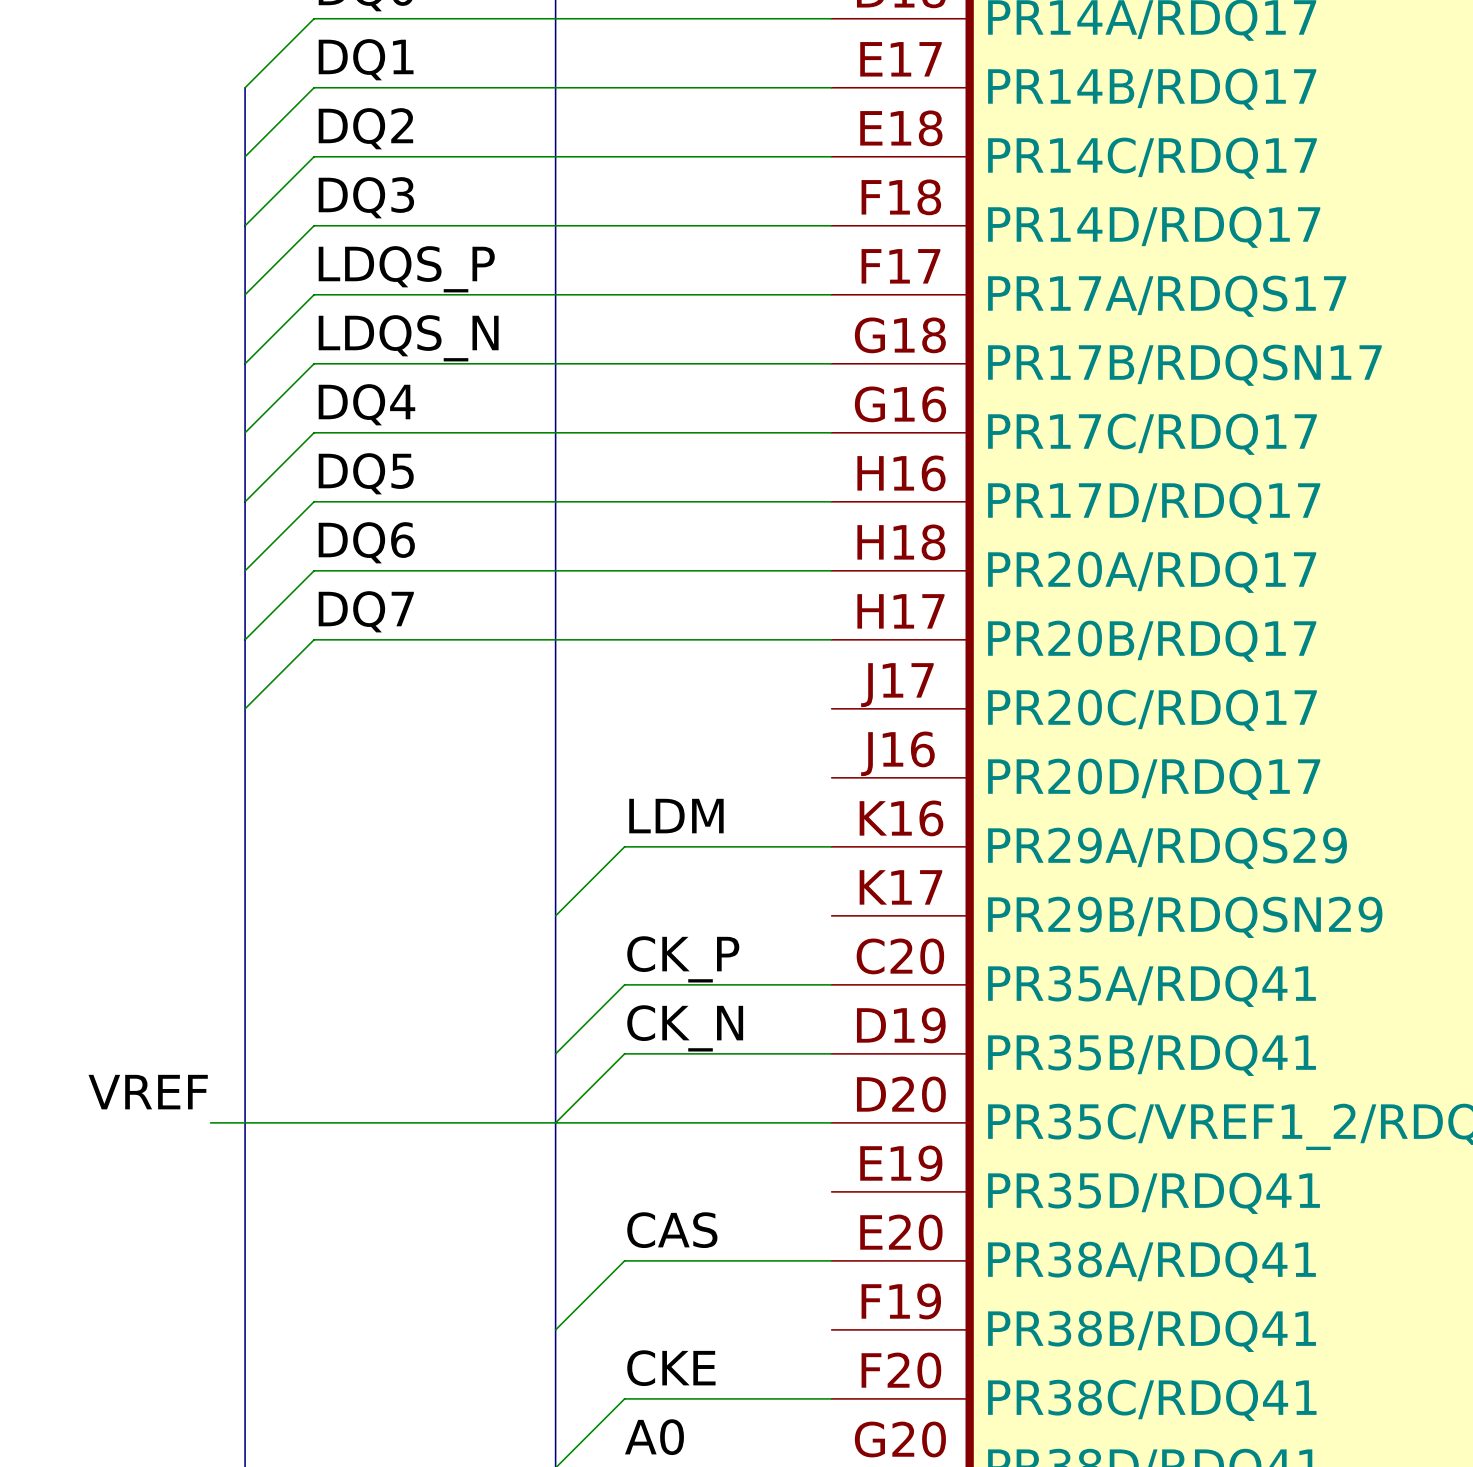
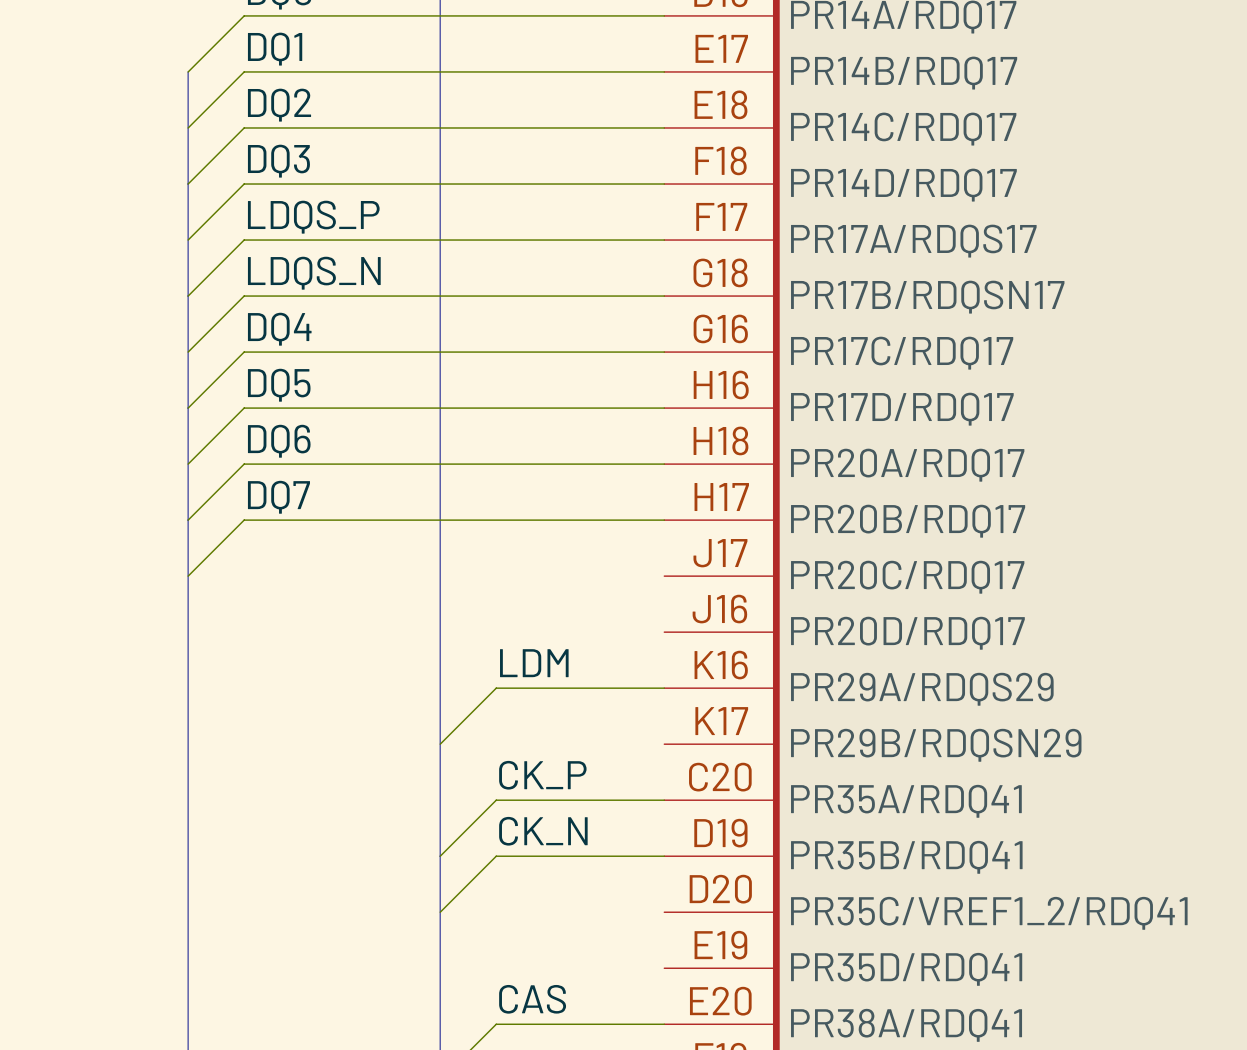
label: VREF (148, 1092) -> none
wire: (210, 1122) (831, 1122) -> none

